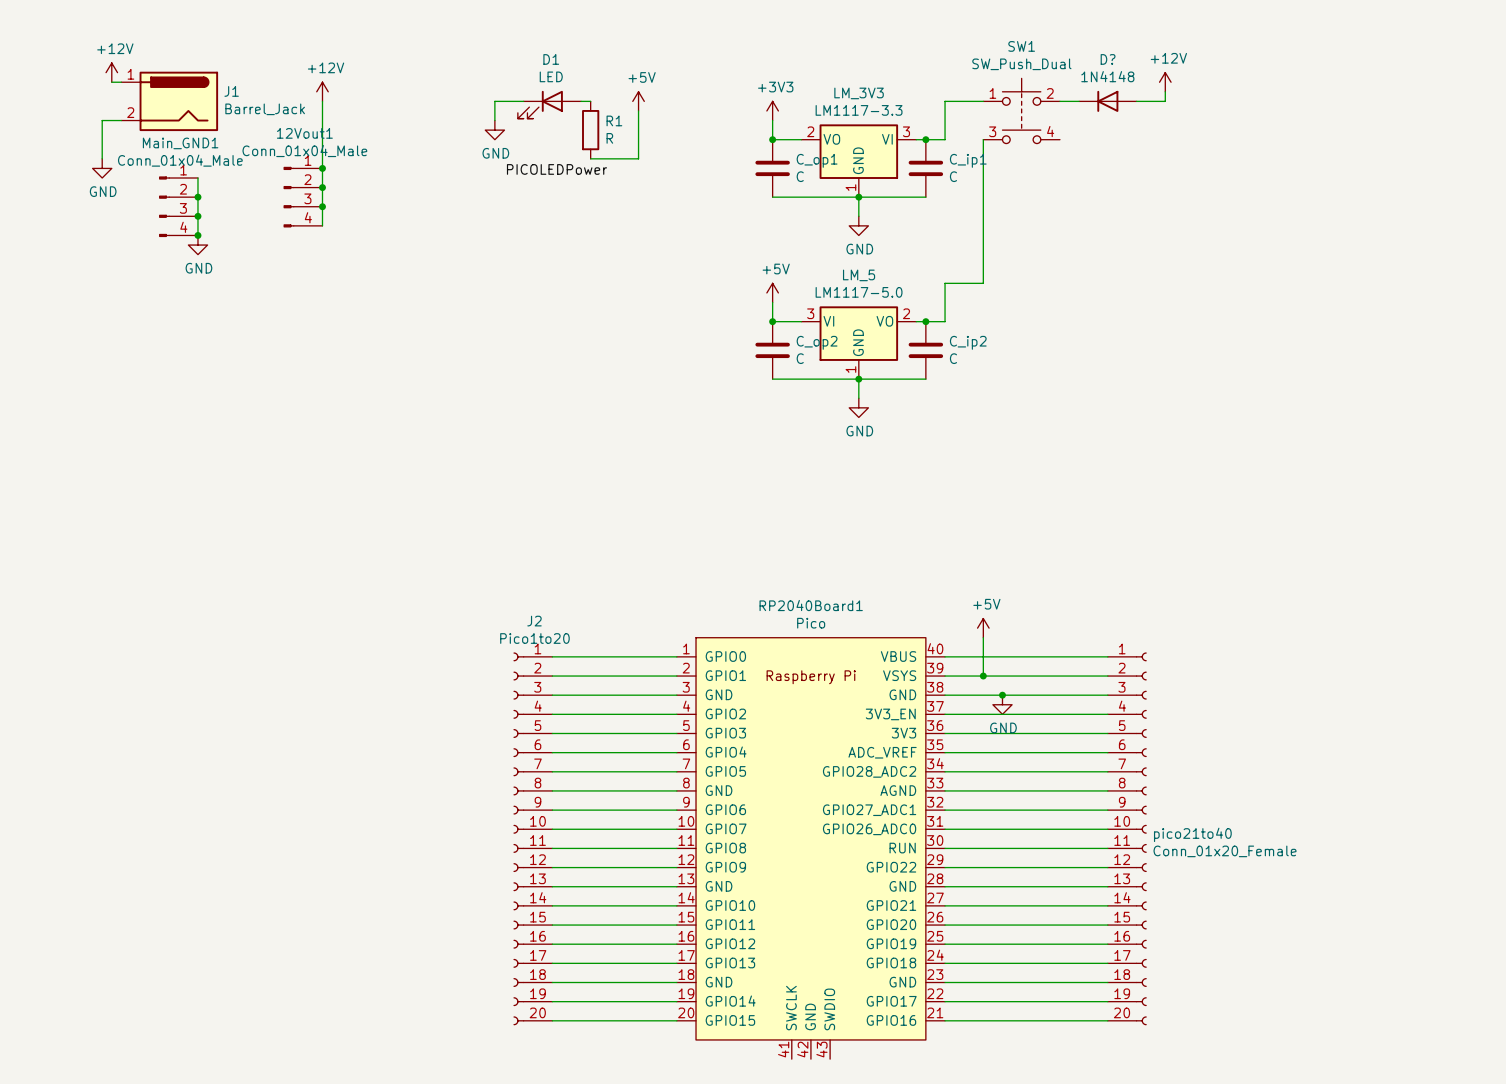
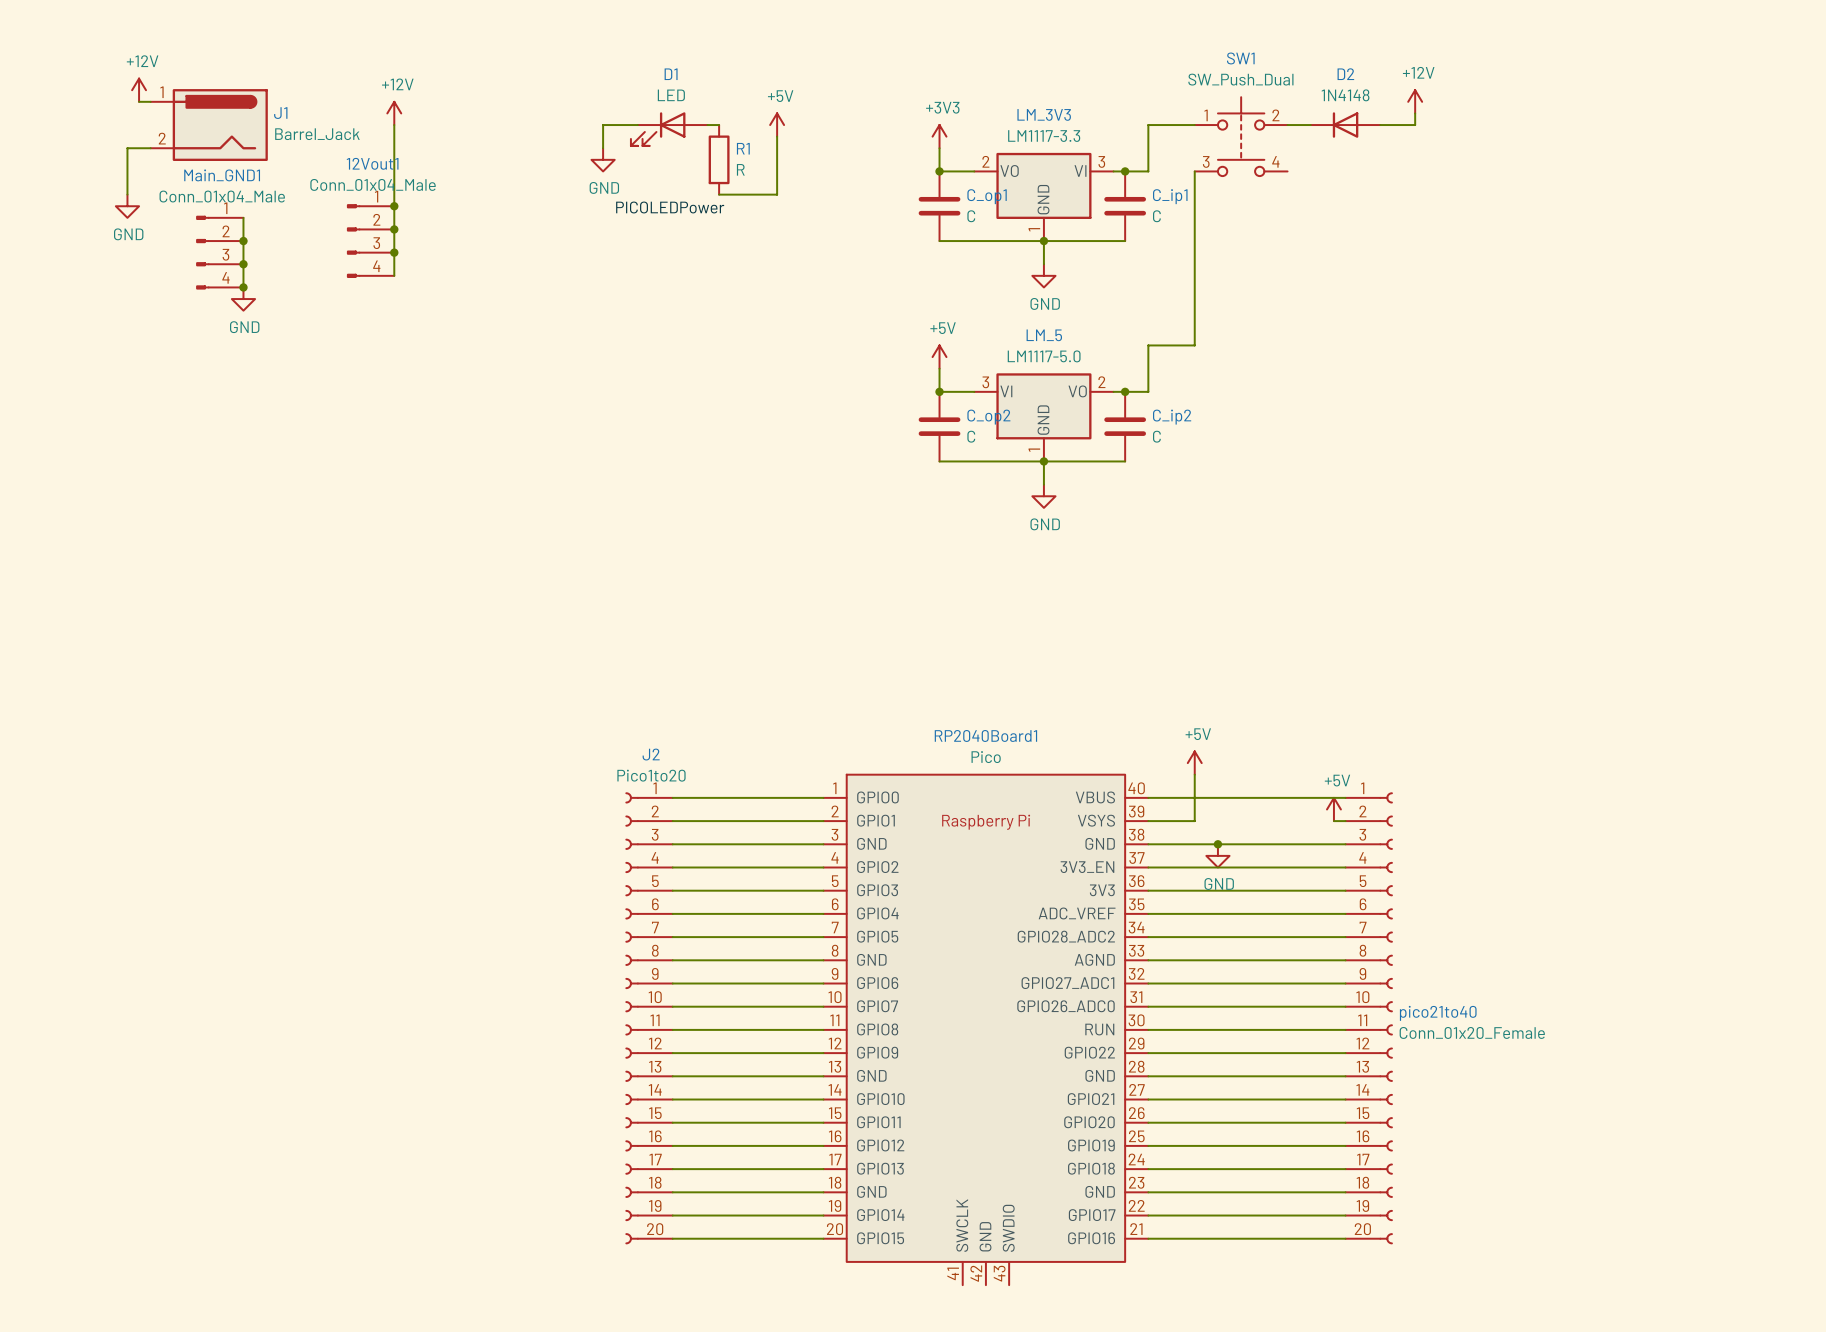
D? name: D? (1108, 59) -> D2 (1345, 74)
power symbol: none -> +5V (1333, 809)
wire: (983, 676) (1098, 676) -> none
junction: (983, 676) -> none

